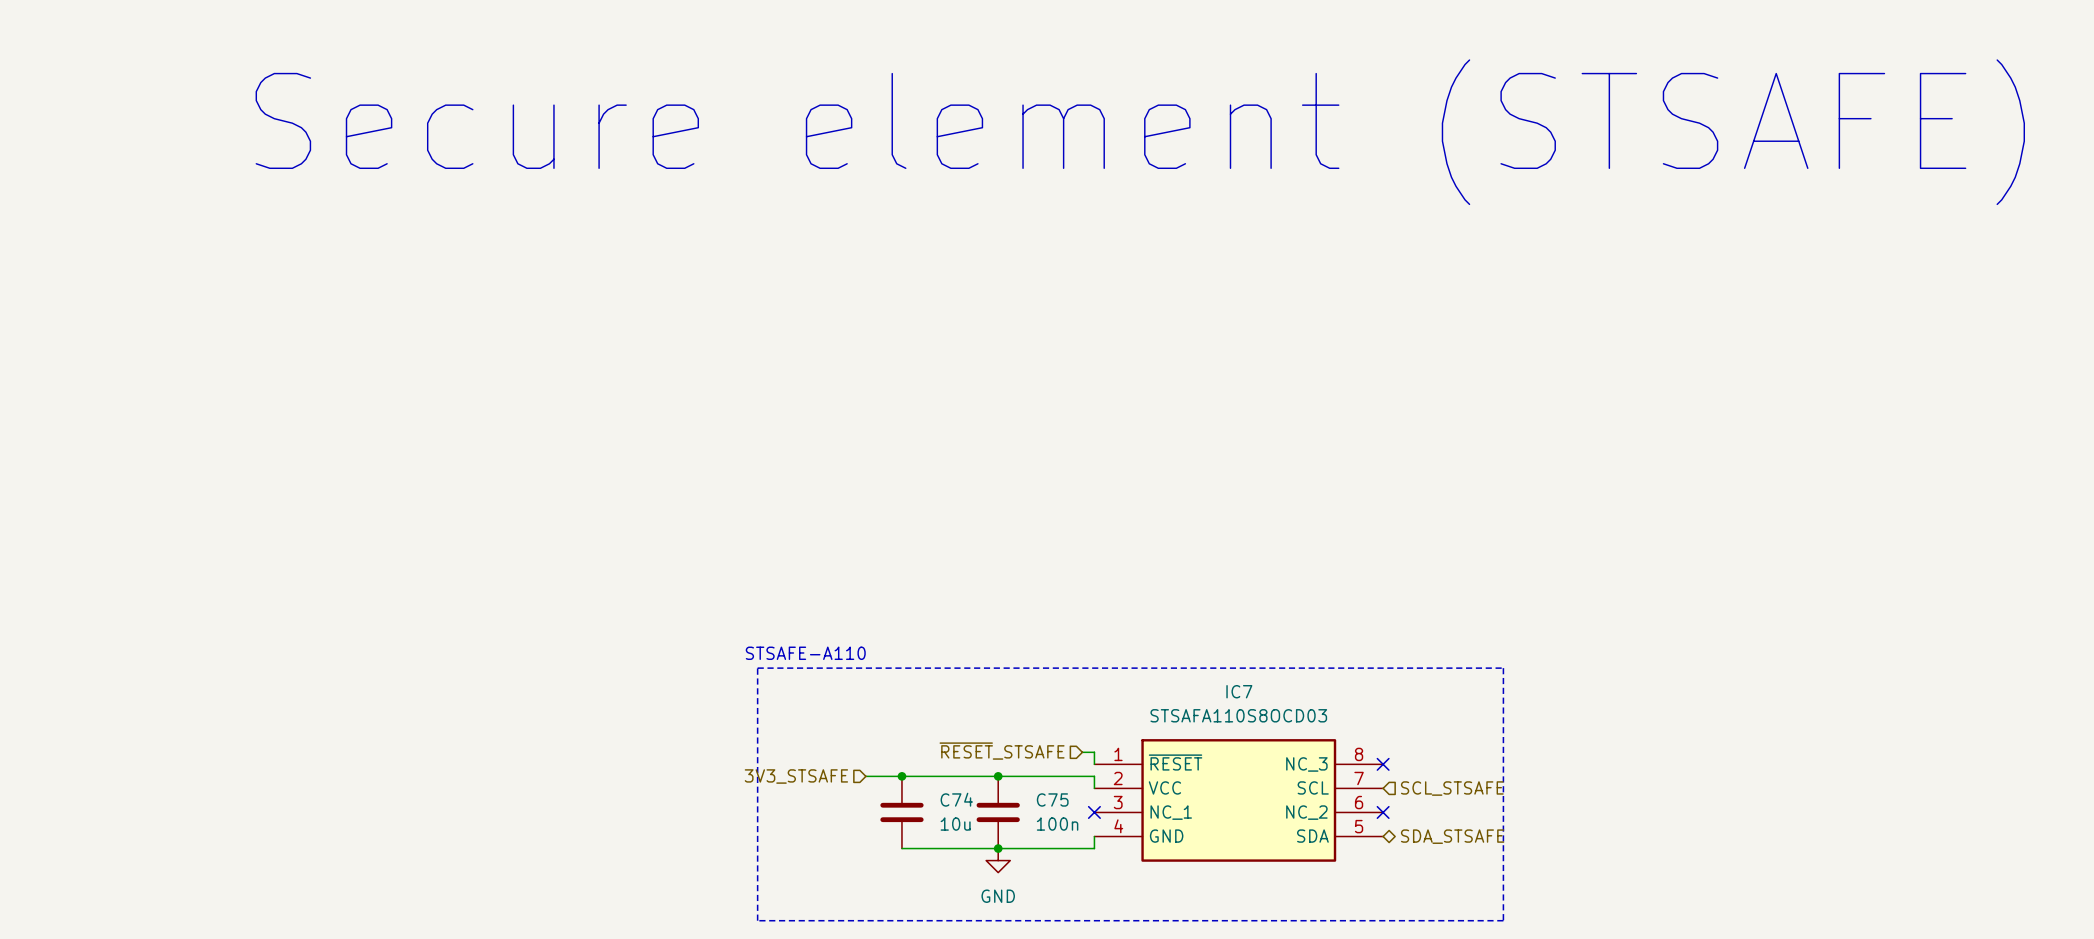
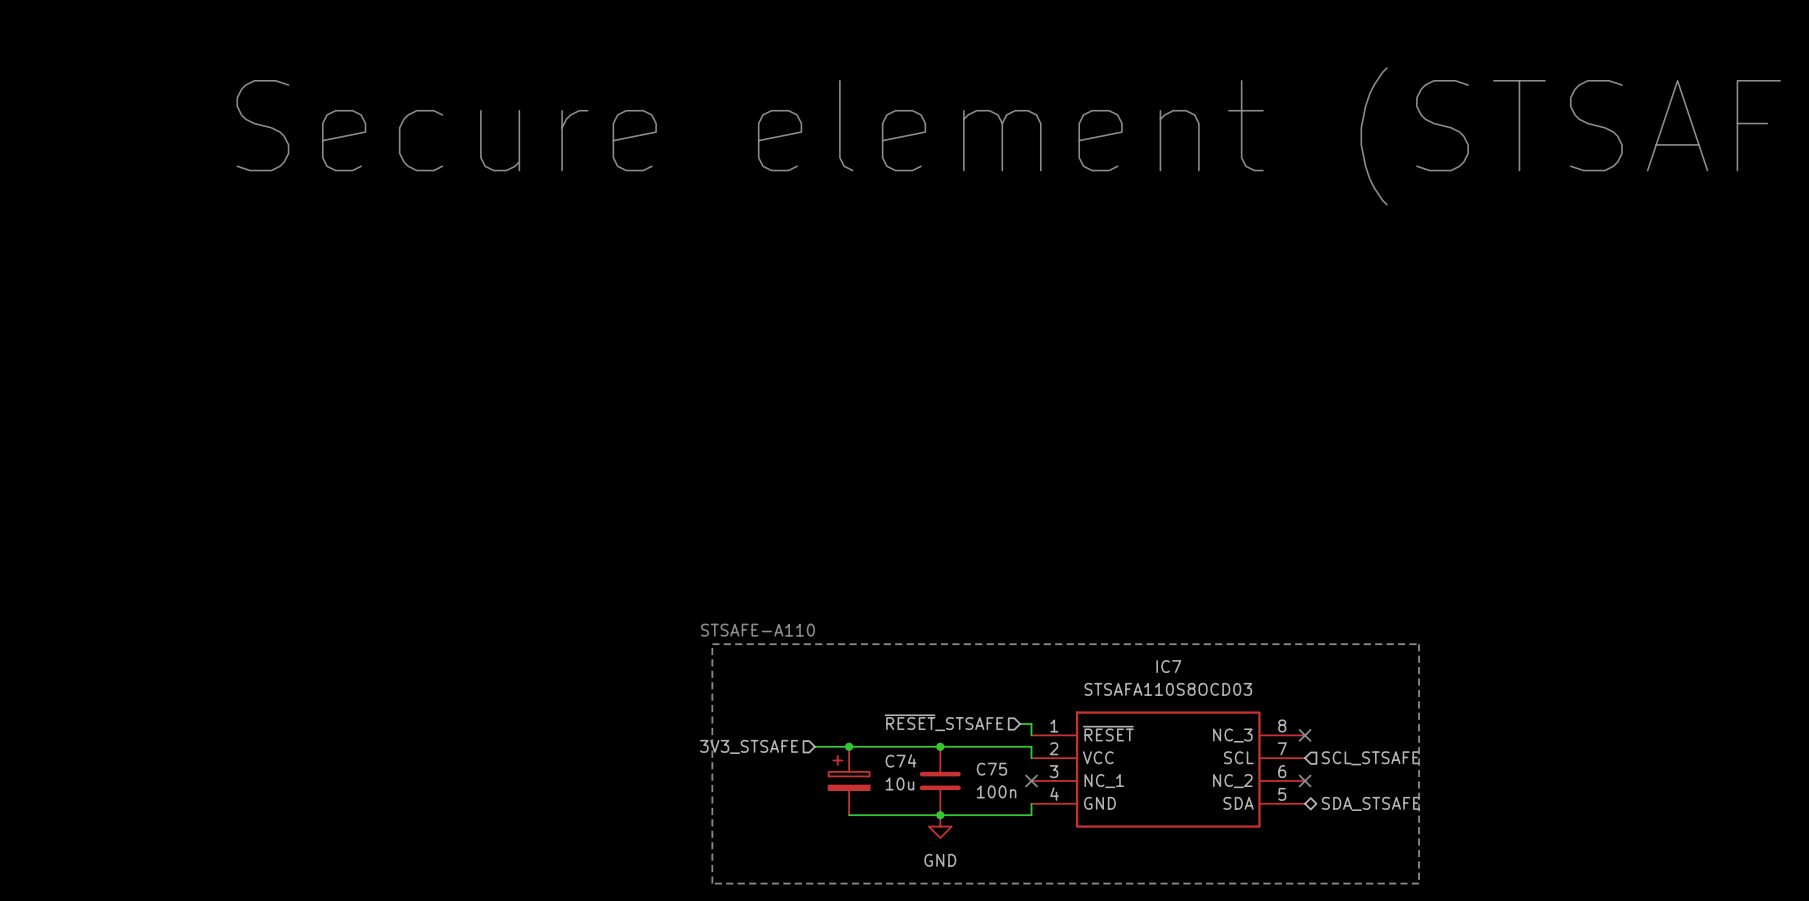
C74 symbol: [880, 776, 924, 849] -> [828, 746, 870, 816]

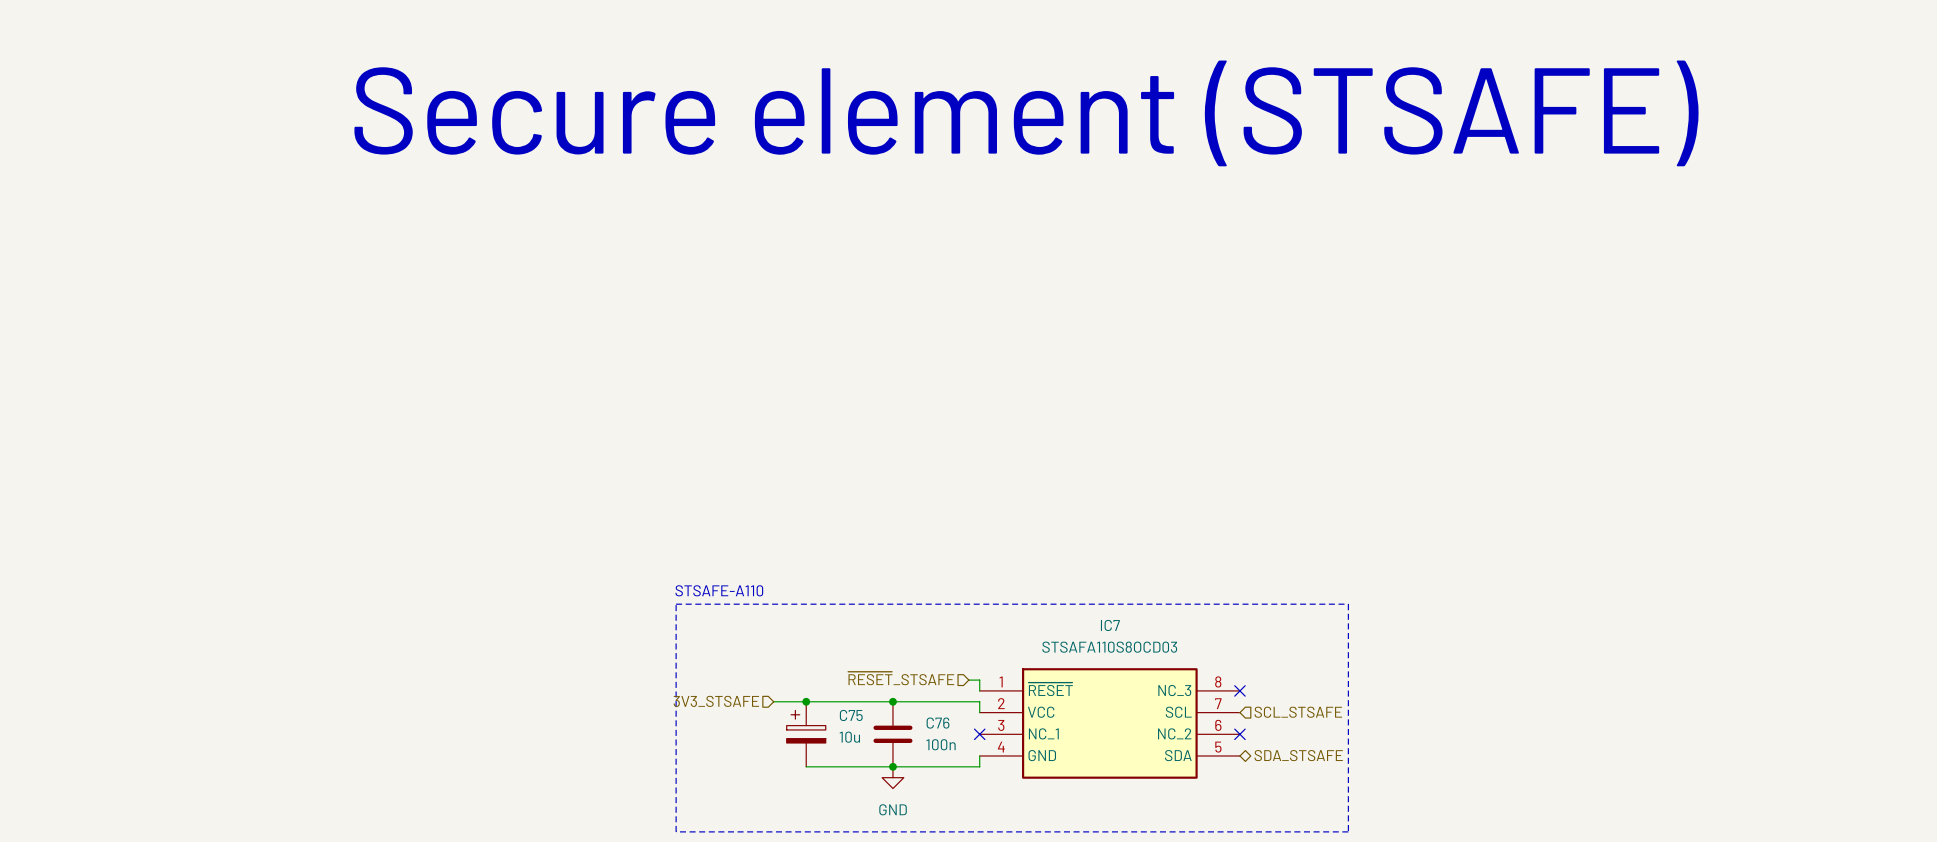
C74 name: C74 (901, 760) -> C75 (851, 715)
C75 name: C75 (991, 769) -> C76 (938, 723)

